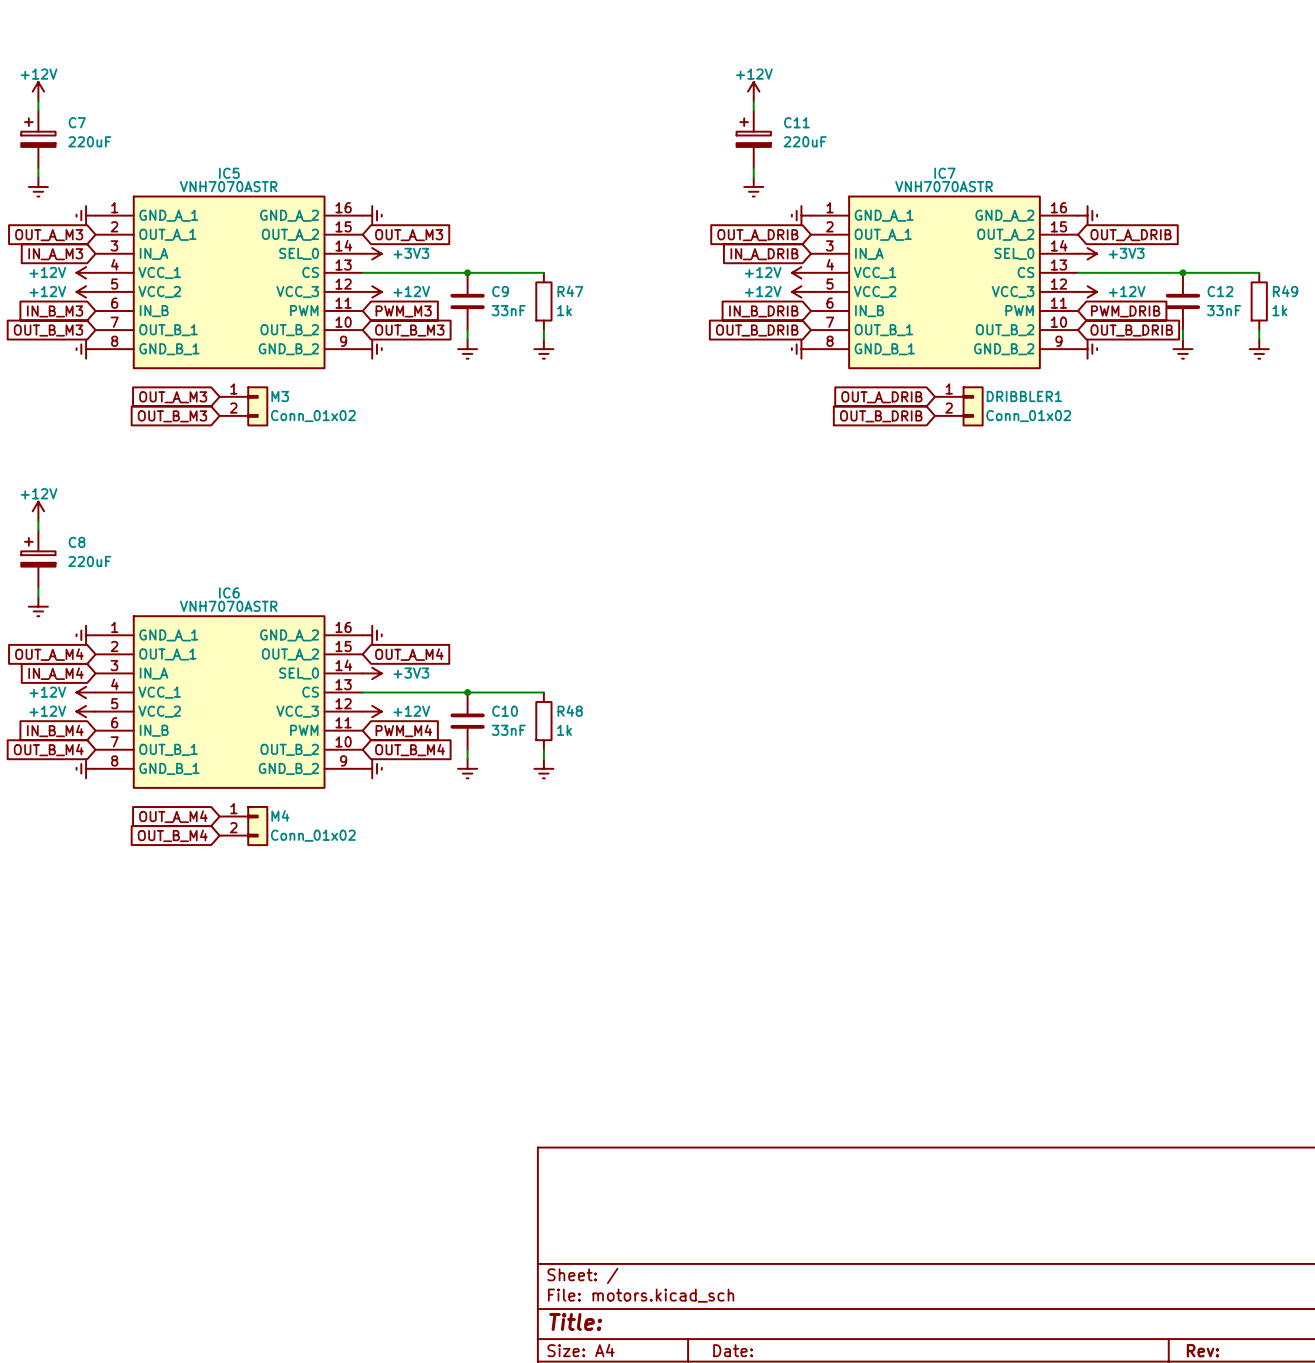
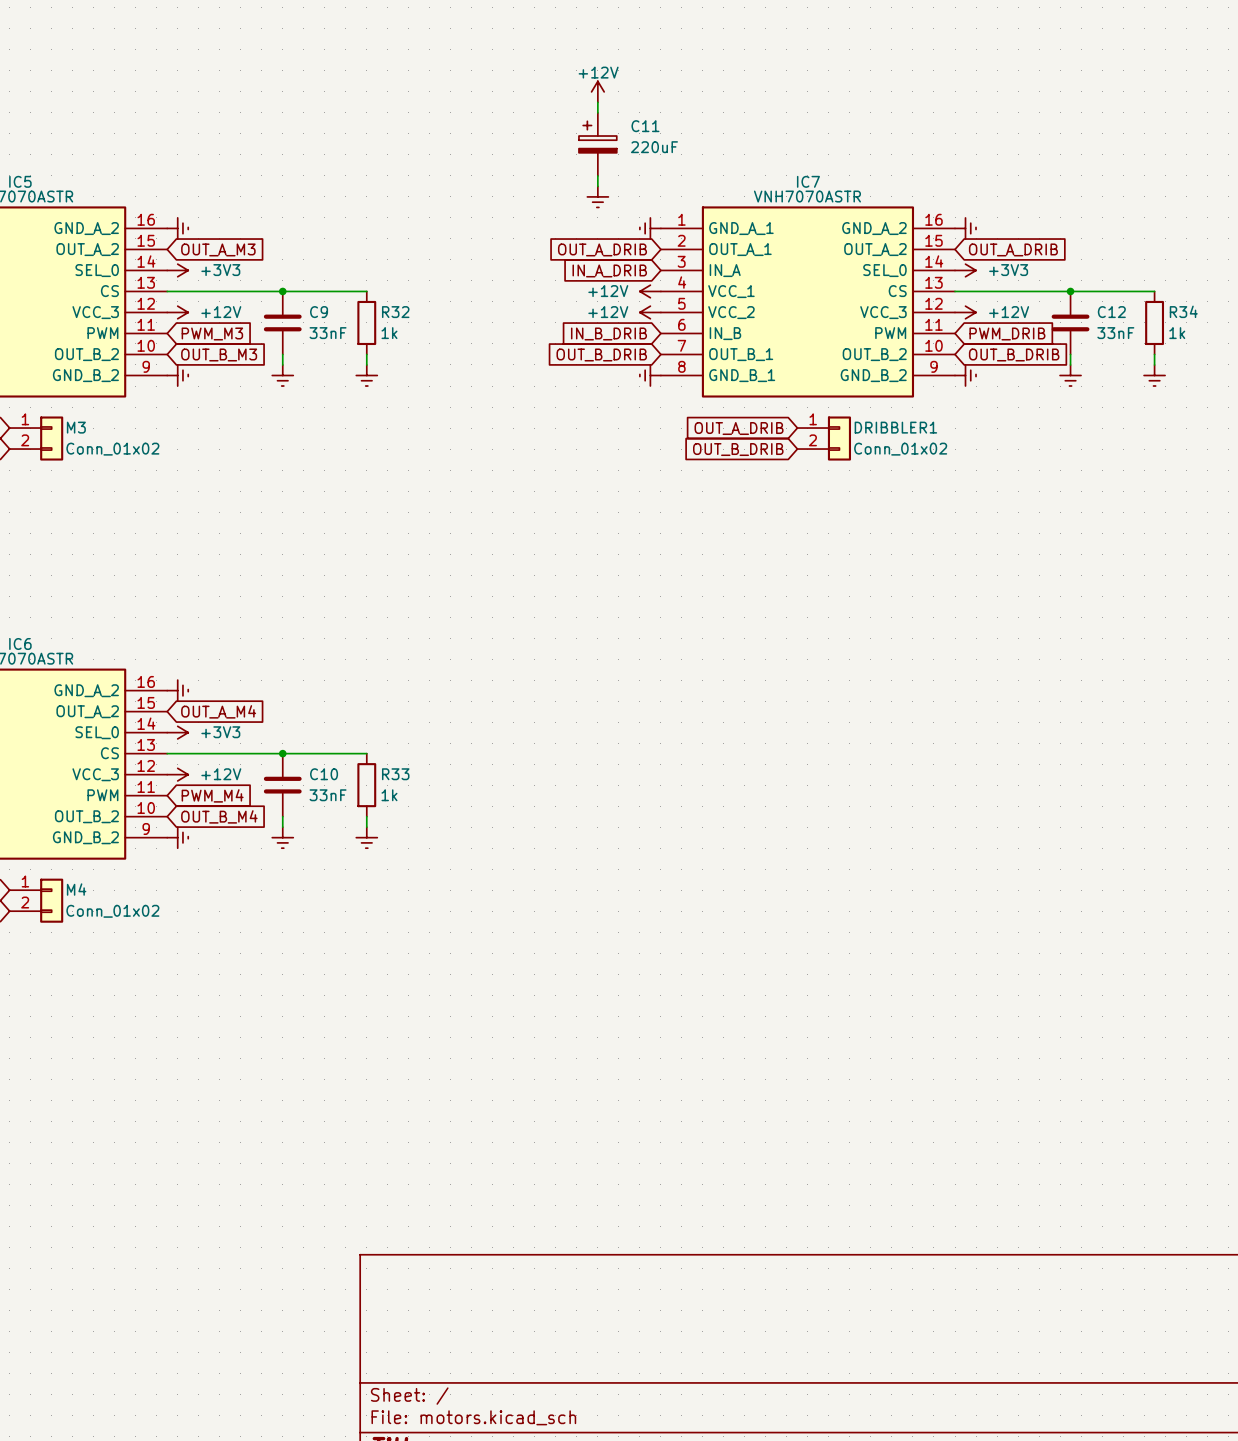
R47 name: R47 (570, 291) -> R32 (395, 312)
R49 name: R49 (1285, 291) -> R34 (1183, 311)
R48 name: R48 (570, 711) -> R33 (395, 774)

